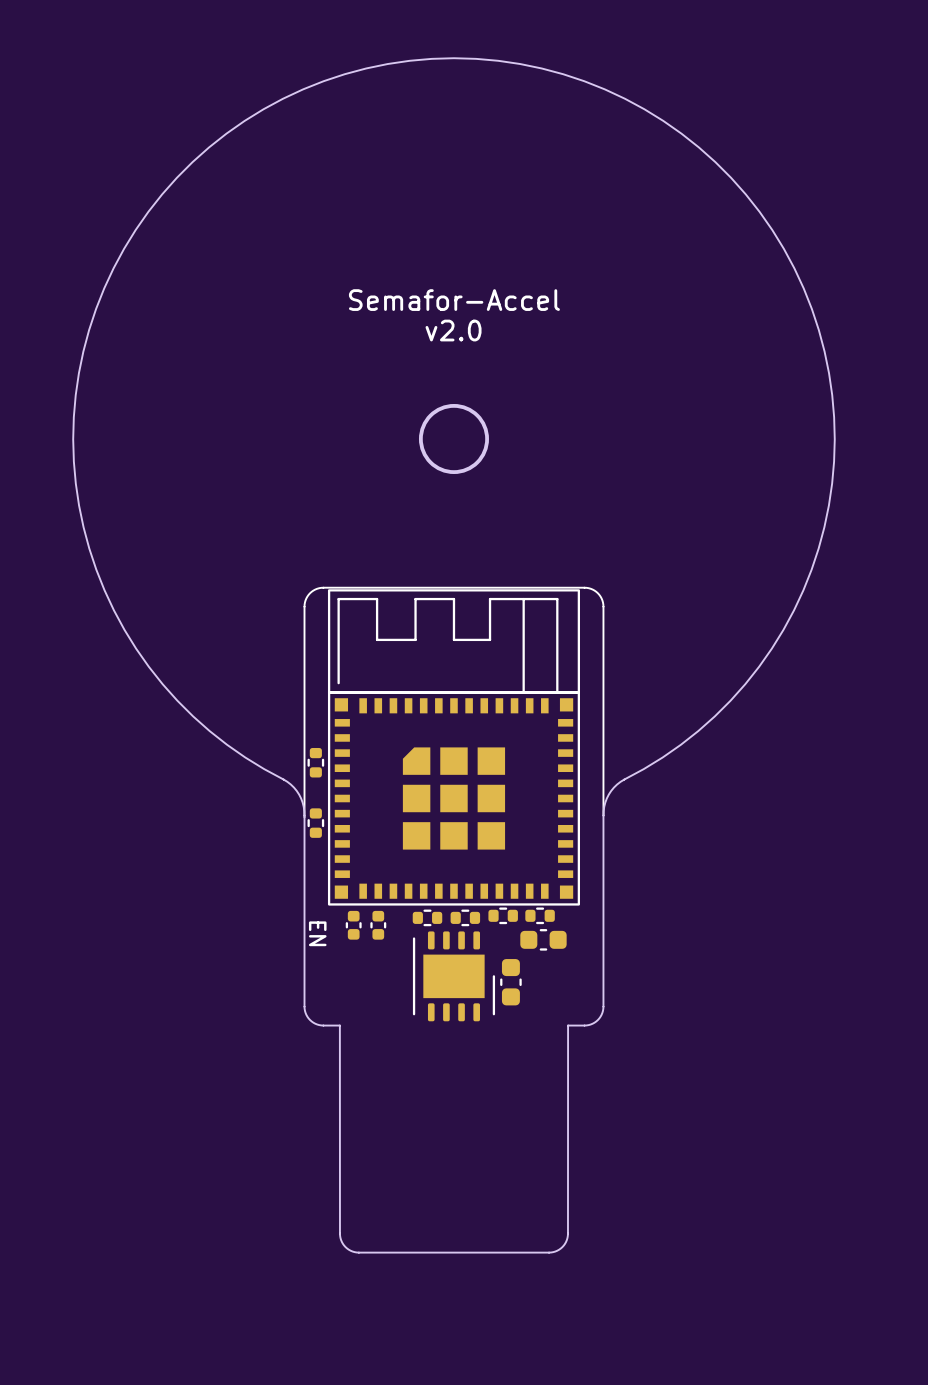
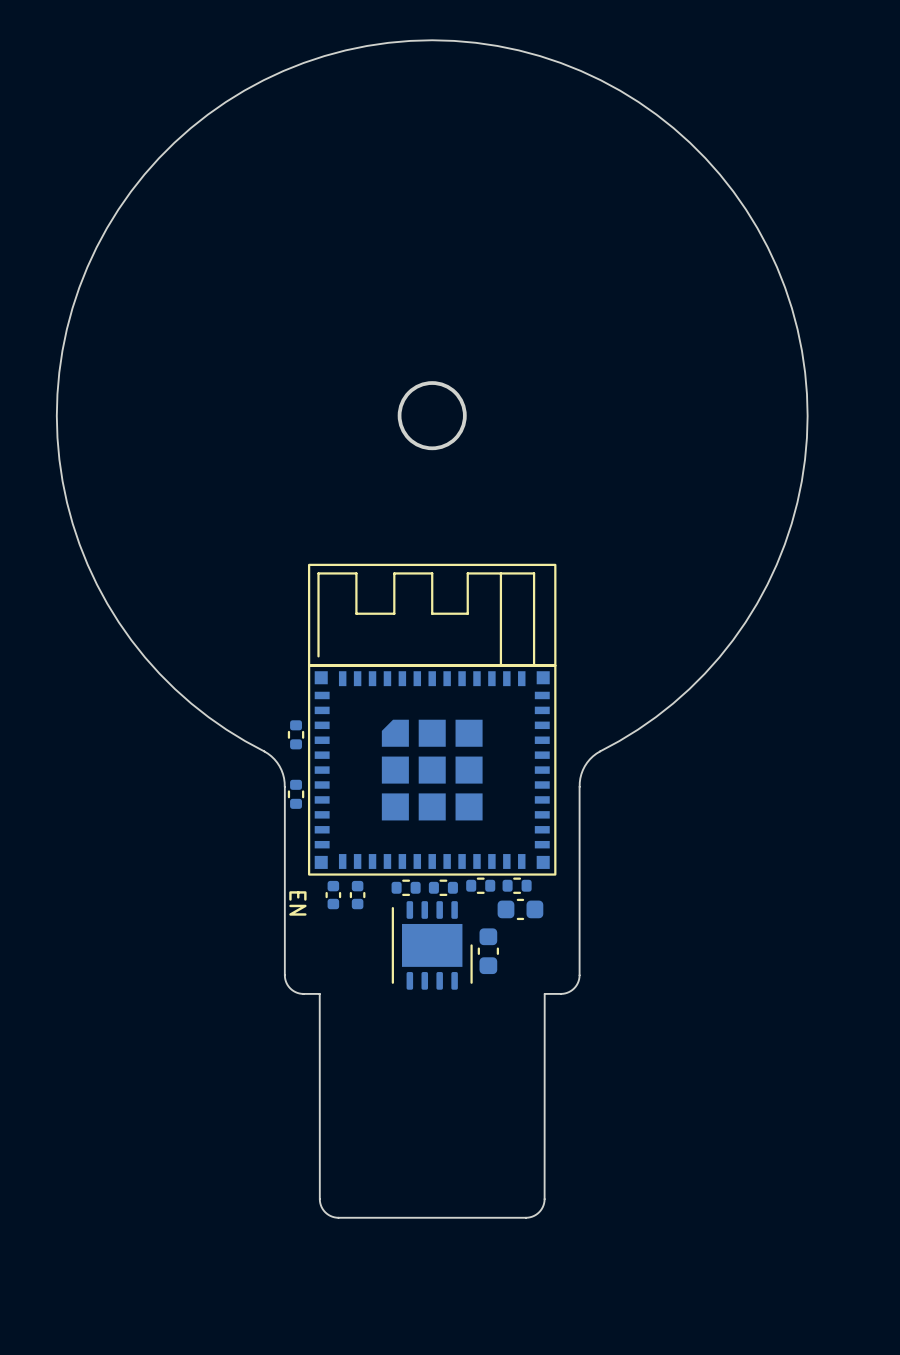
text: Semafor-Accel (454, 300) -> none
text: v2.0 (453, 330) -> none
line: (603, 815) (603, 606) (601, 598) (596, 591) (584, 587) (323, 587) (310, 593) (304, 604) (304, 817) -> none

